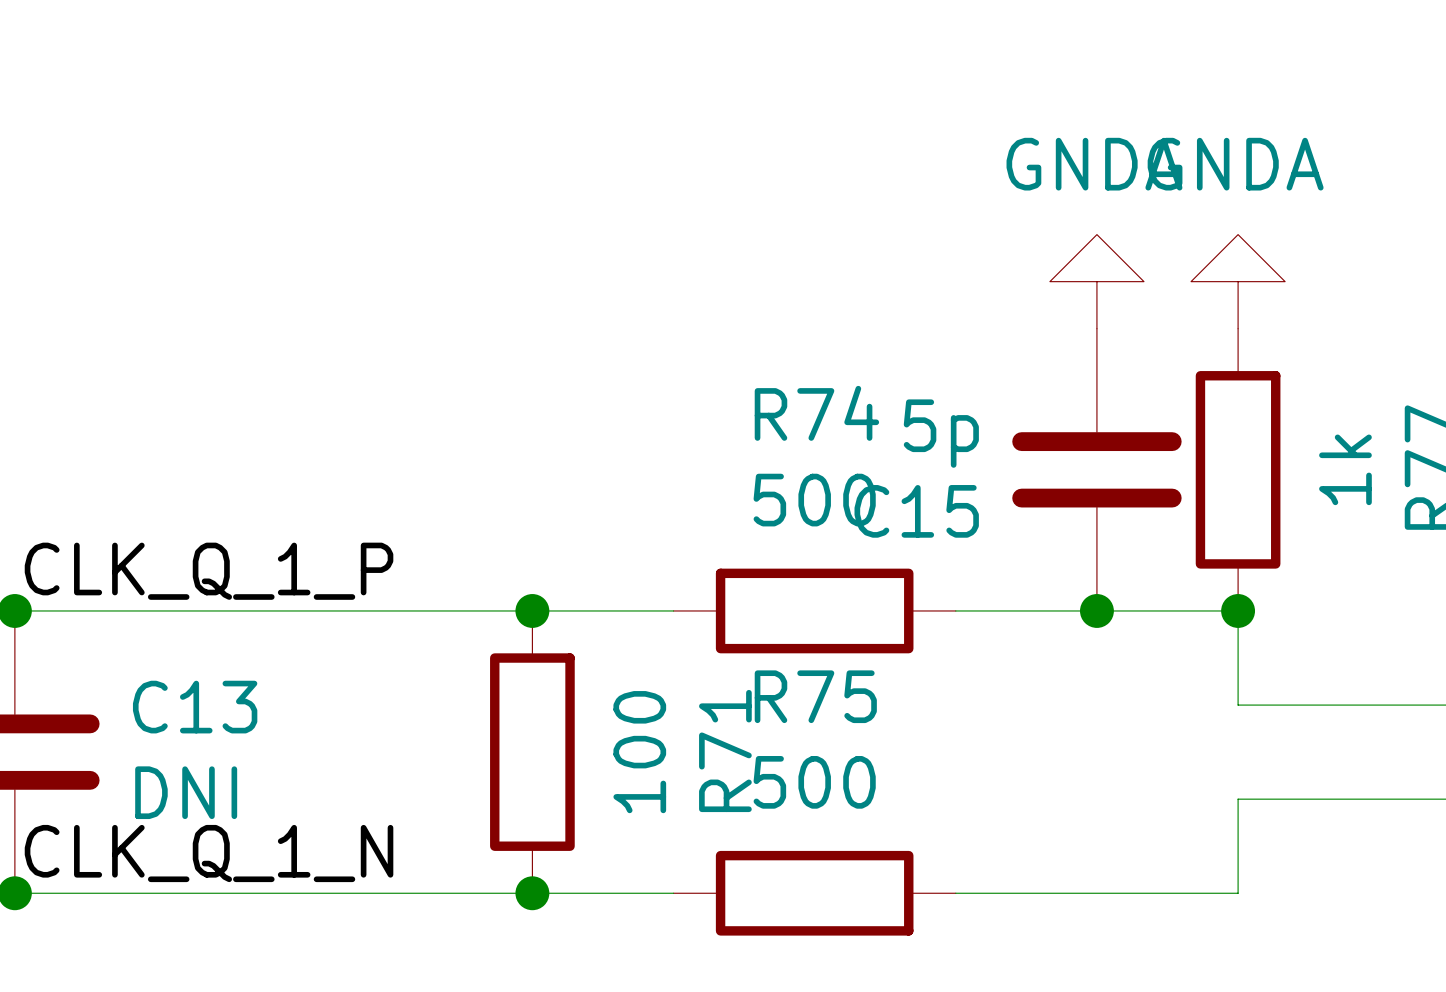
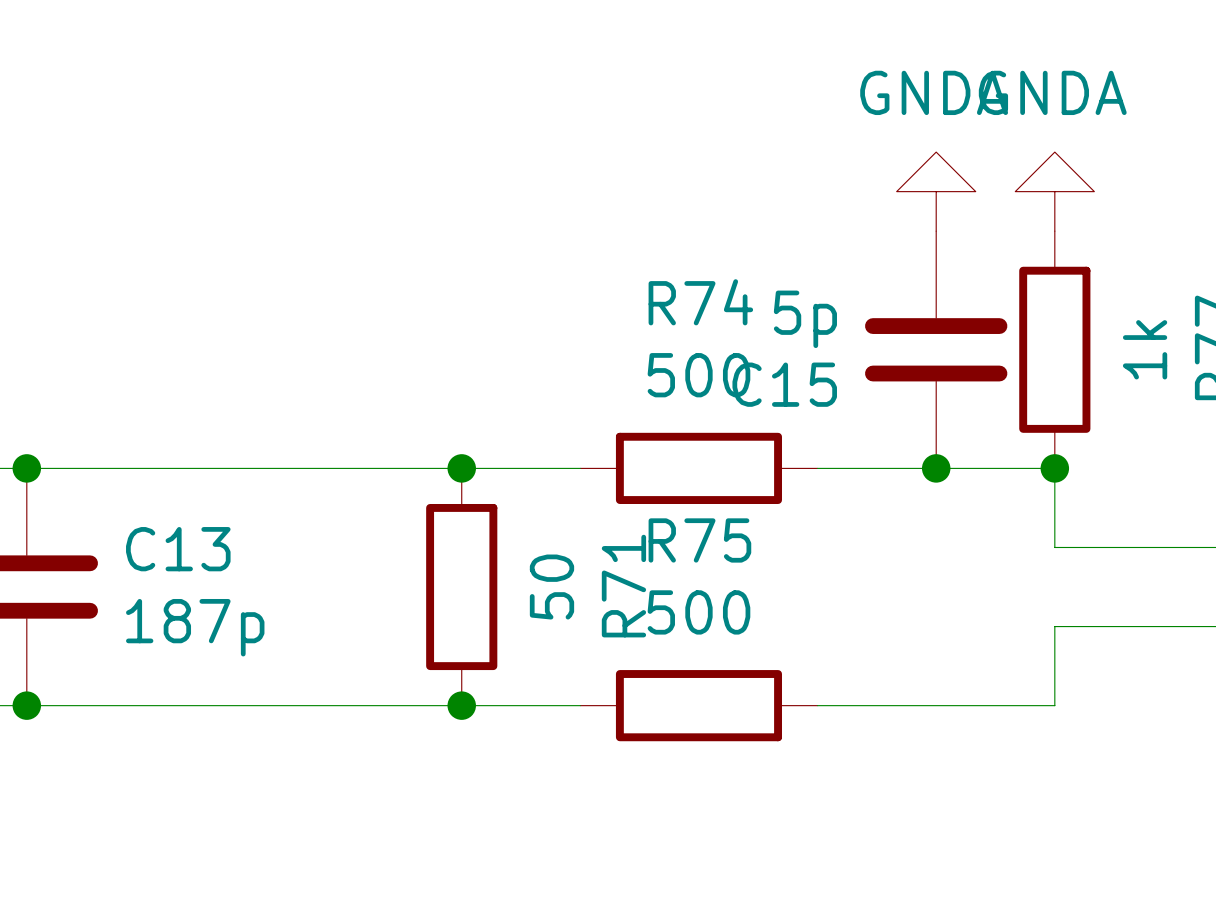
label: CLK_Q_1_P (209, 571) -> none
R71 value: 100 (639, 752) -> 50 (551, 587)
C13 value: DNI (186, 792) -> 187p (195, 627)
label: CLK_Q_1_N (209, 853) -> none

